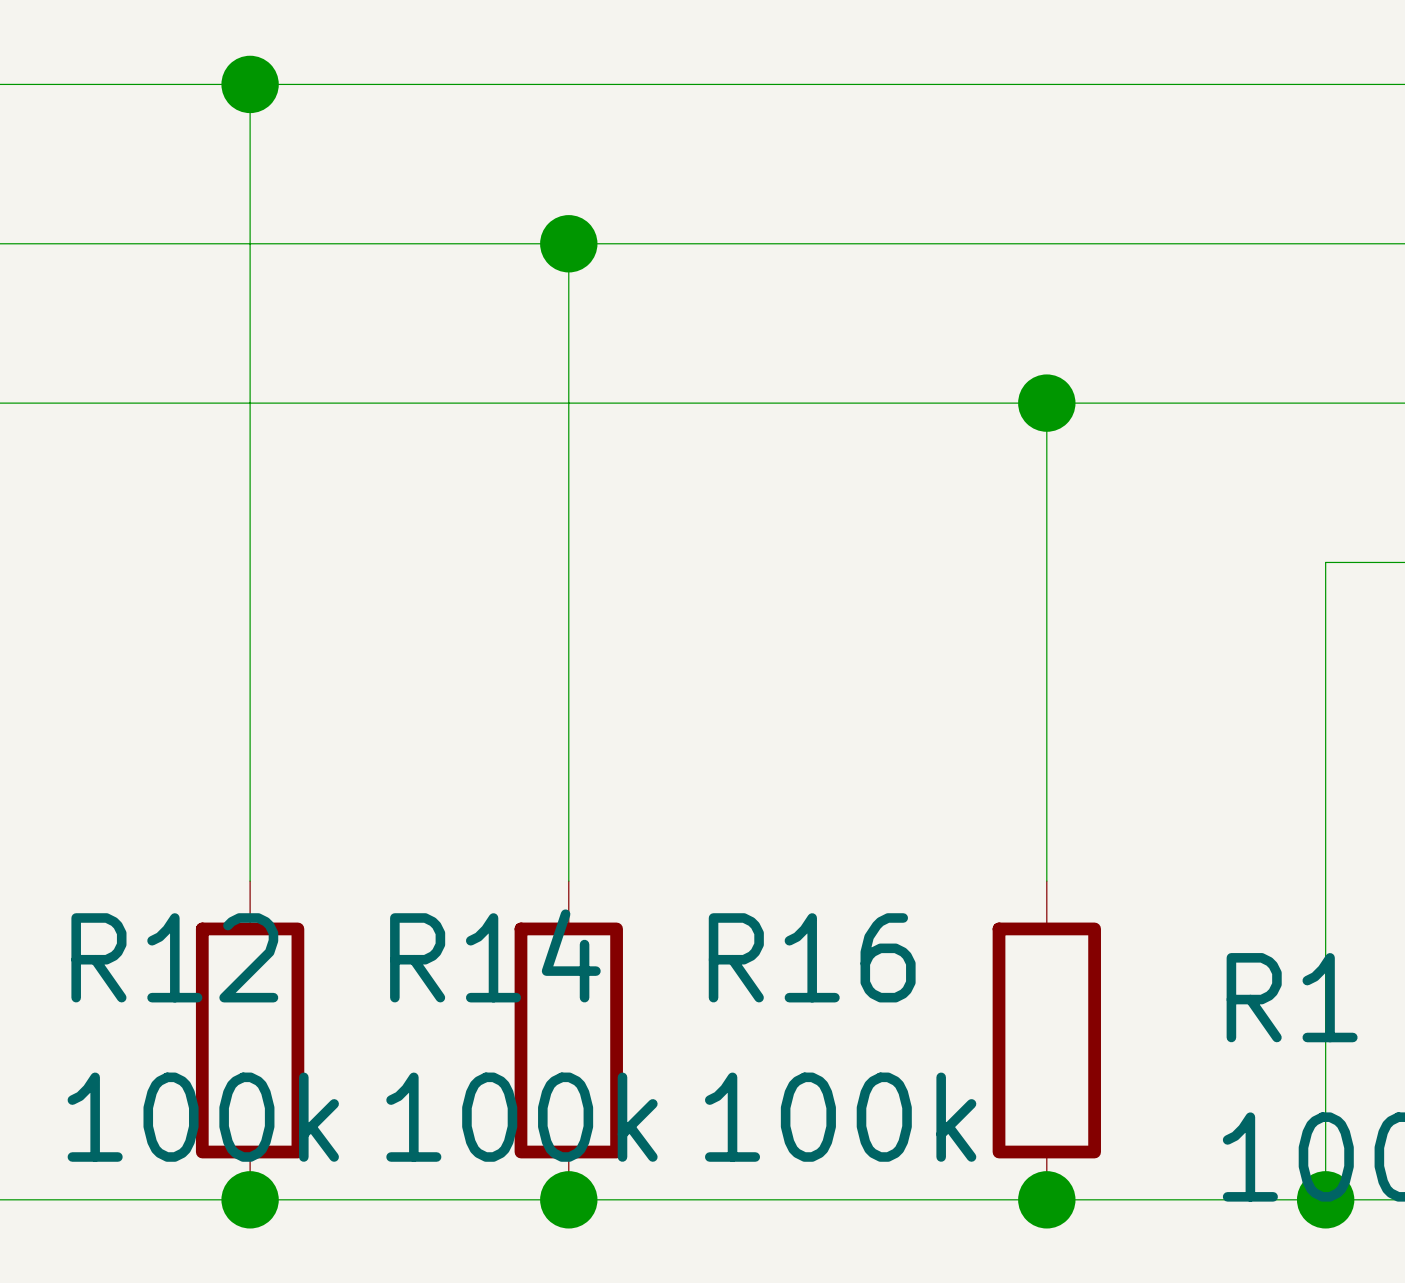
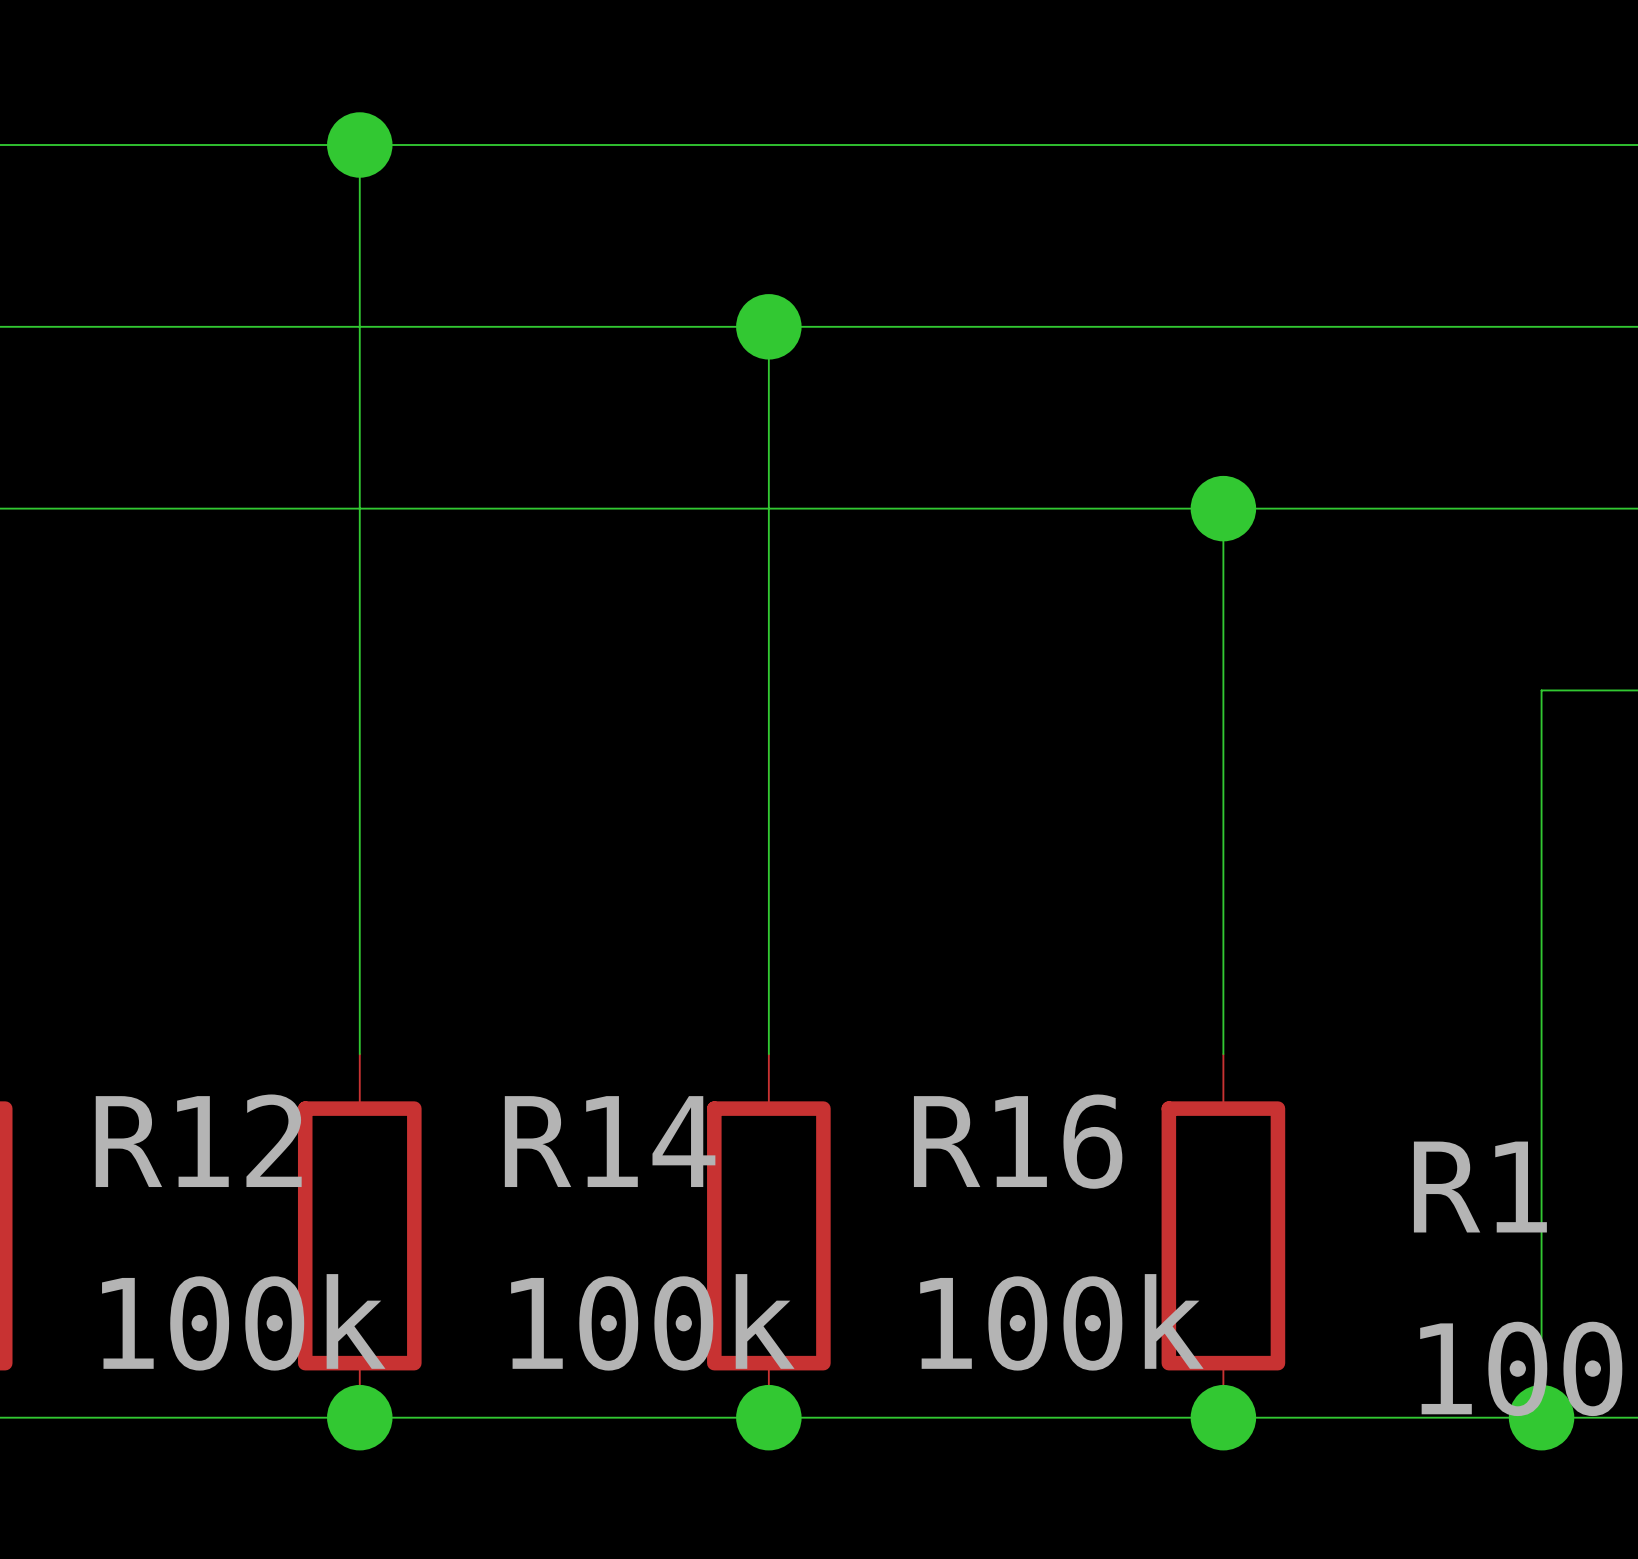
wire: (250, 84) (250, 881) -> (359, 145) (359, 1054)
junction position: (250, 84) -> (359, 145)
wire: (568, 243) (568, 881) -> (768, 326) (768, 1054)
junction position: (568, 243) -> (768, 326)
R14 position: (250, 1040) -> (359, 1235)
R16 position: (568, 1040) -> (768, 1235)
junction position: (250, 1199) -> (359, 1417)
junction position: (568, 1199) -> (768, 1417)

